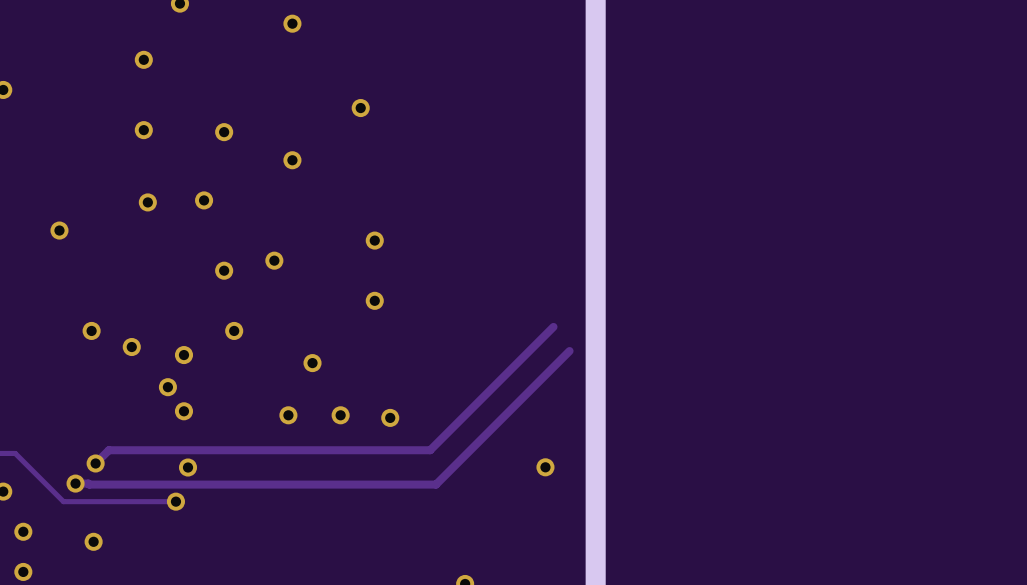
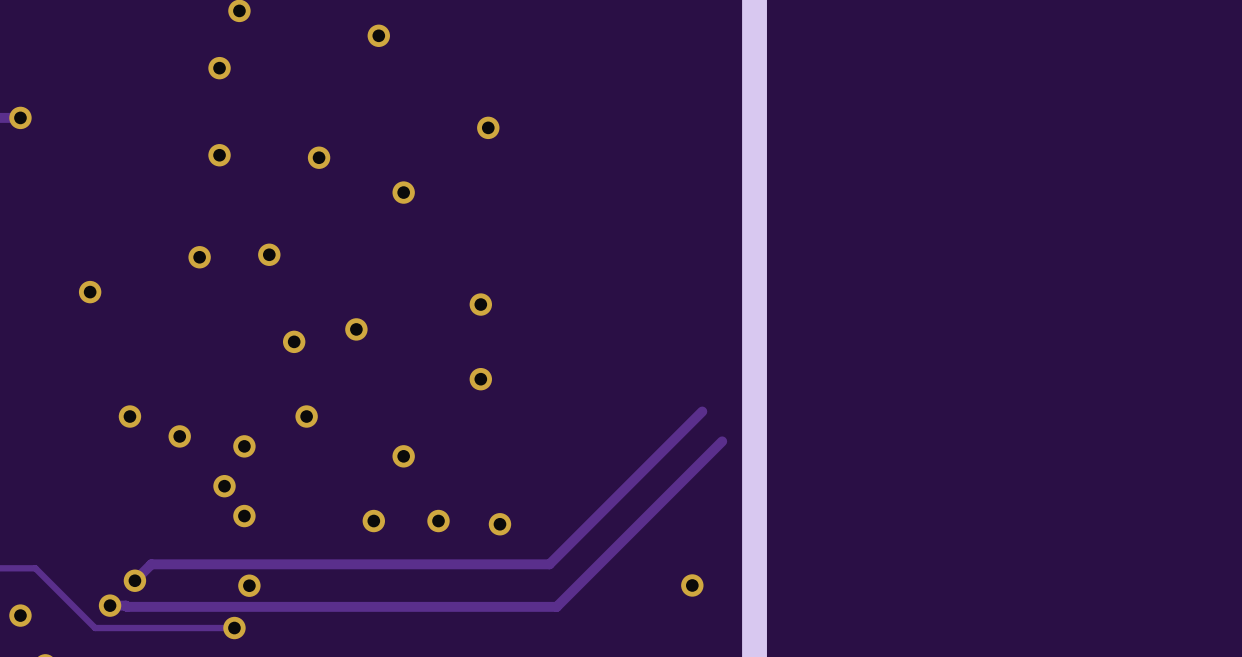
via position: (143, 59) -> (219, 68)
via position: (360, 108) -> (488, 127)
via position: (143, 130) -> (219, 155)
via position: (224, 132) -> (319, 157)
via position: (292, 160) -> (403, 192)

